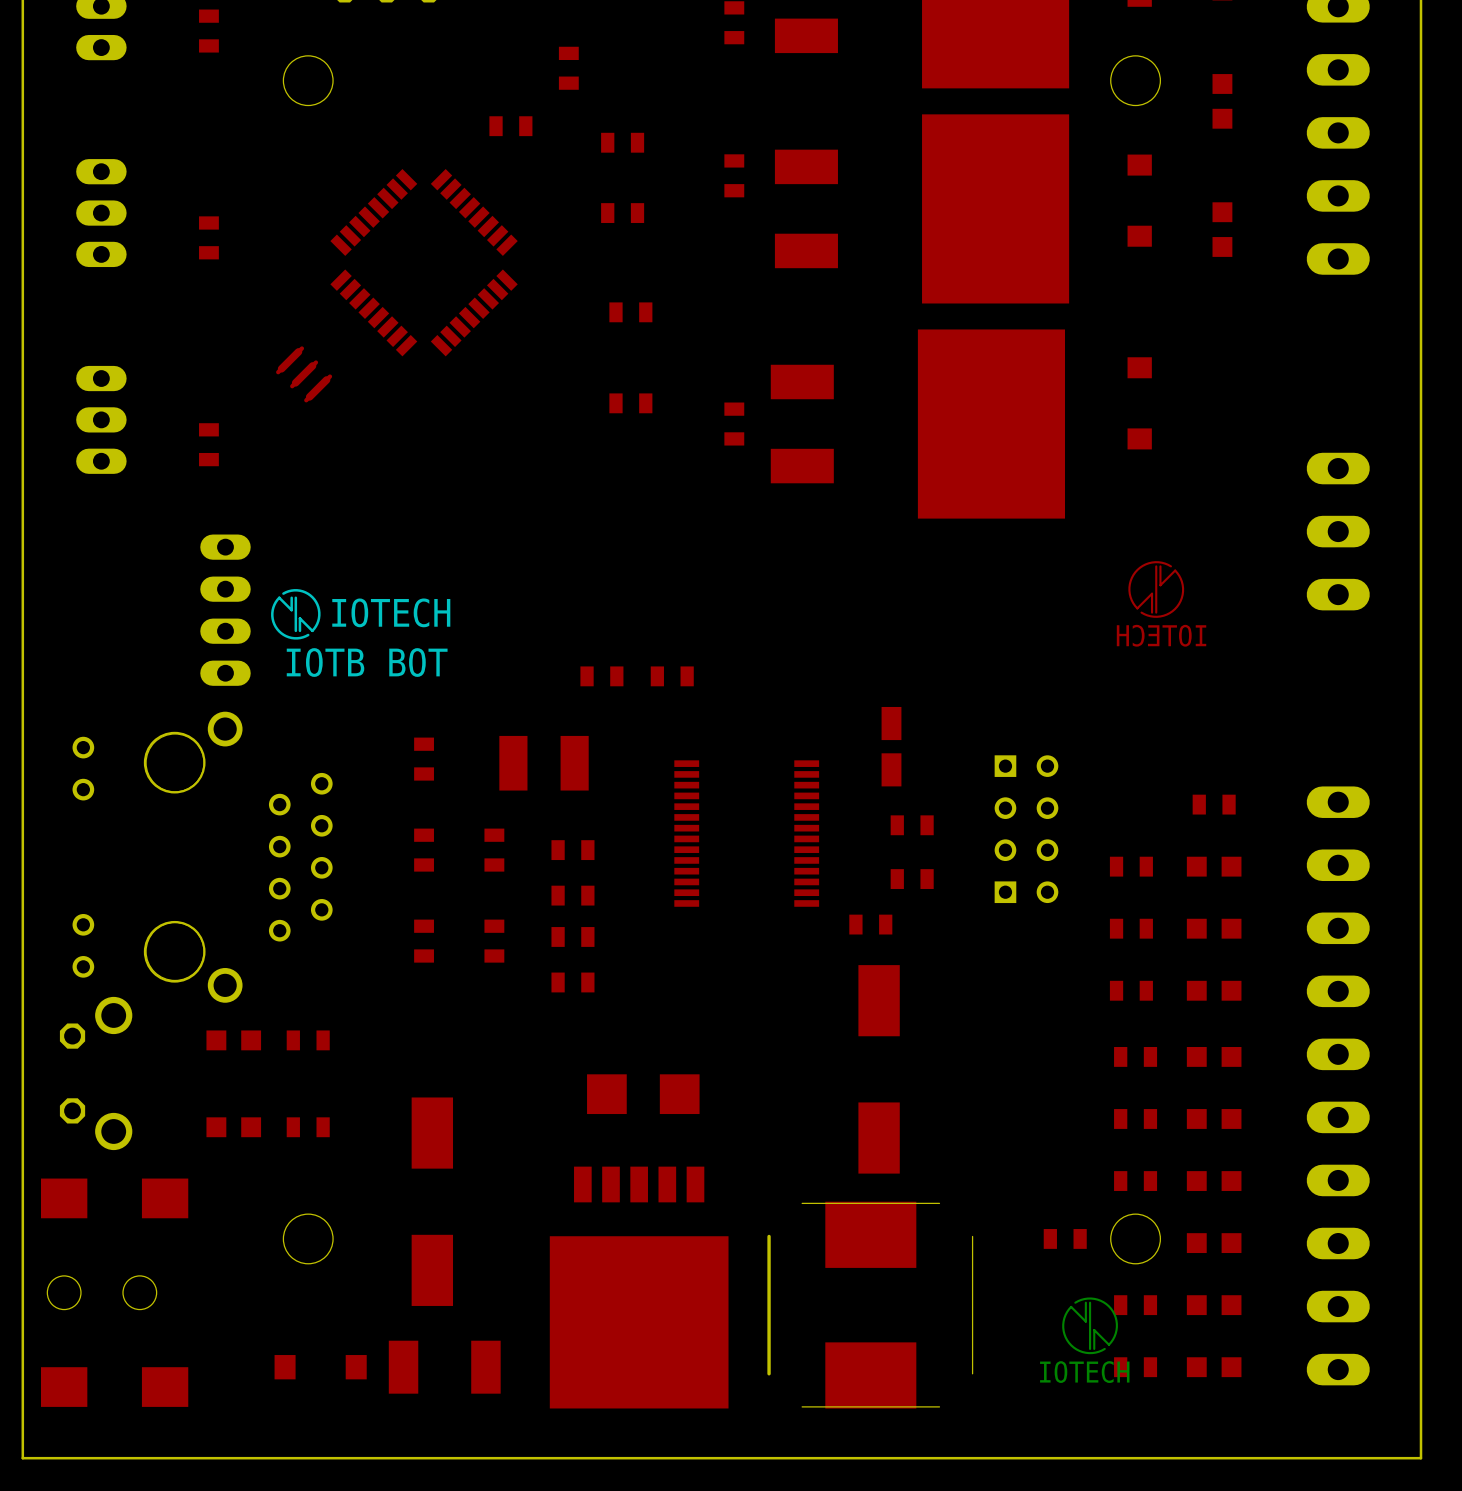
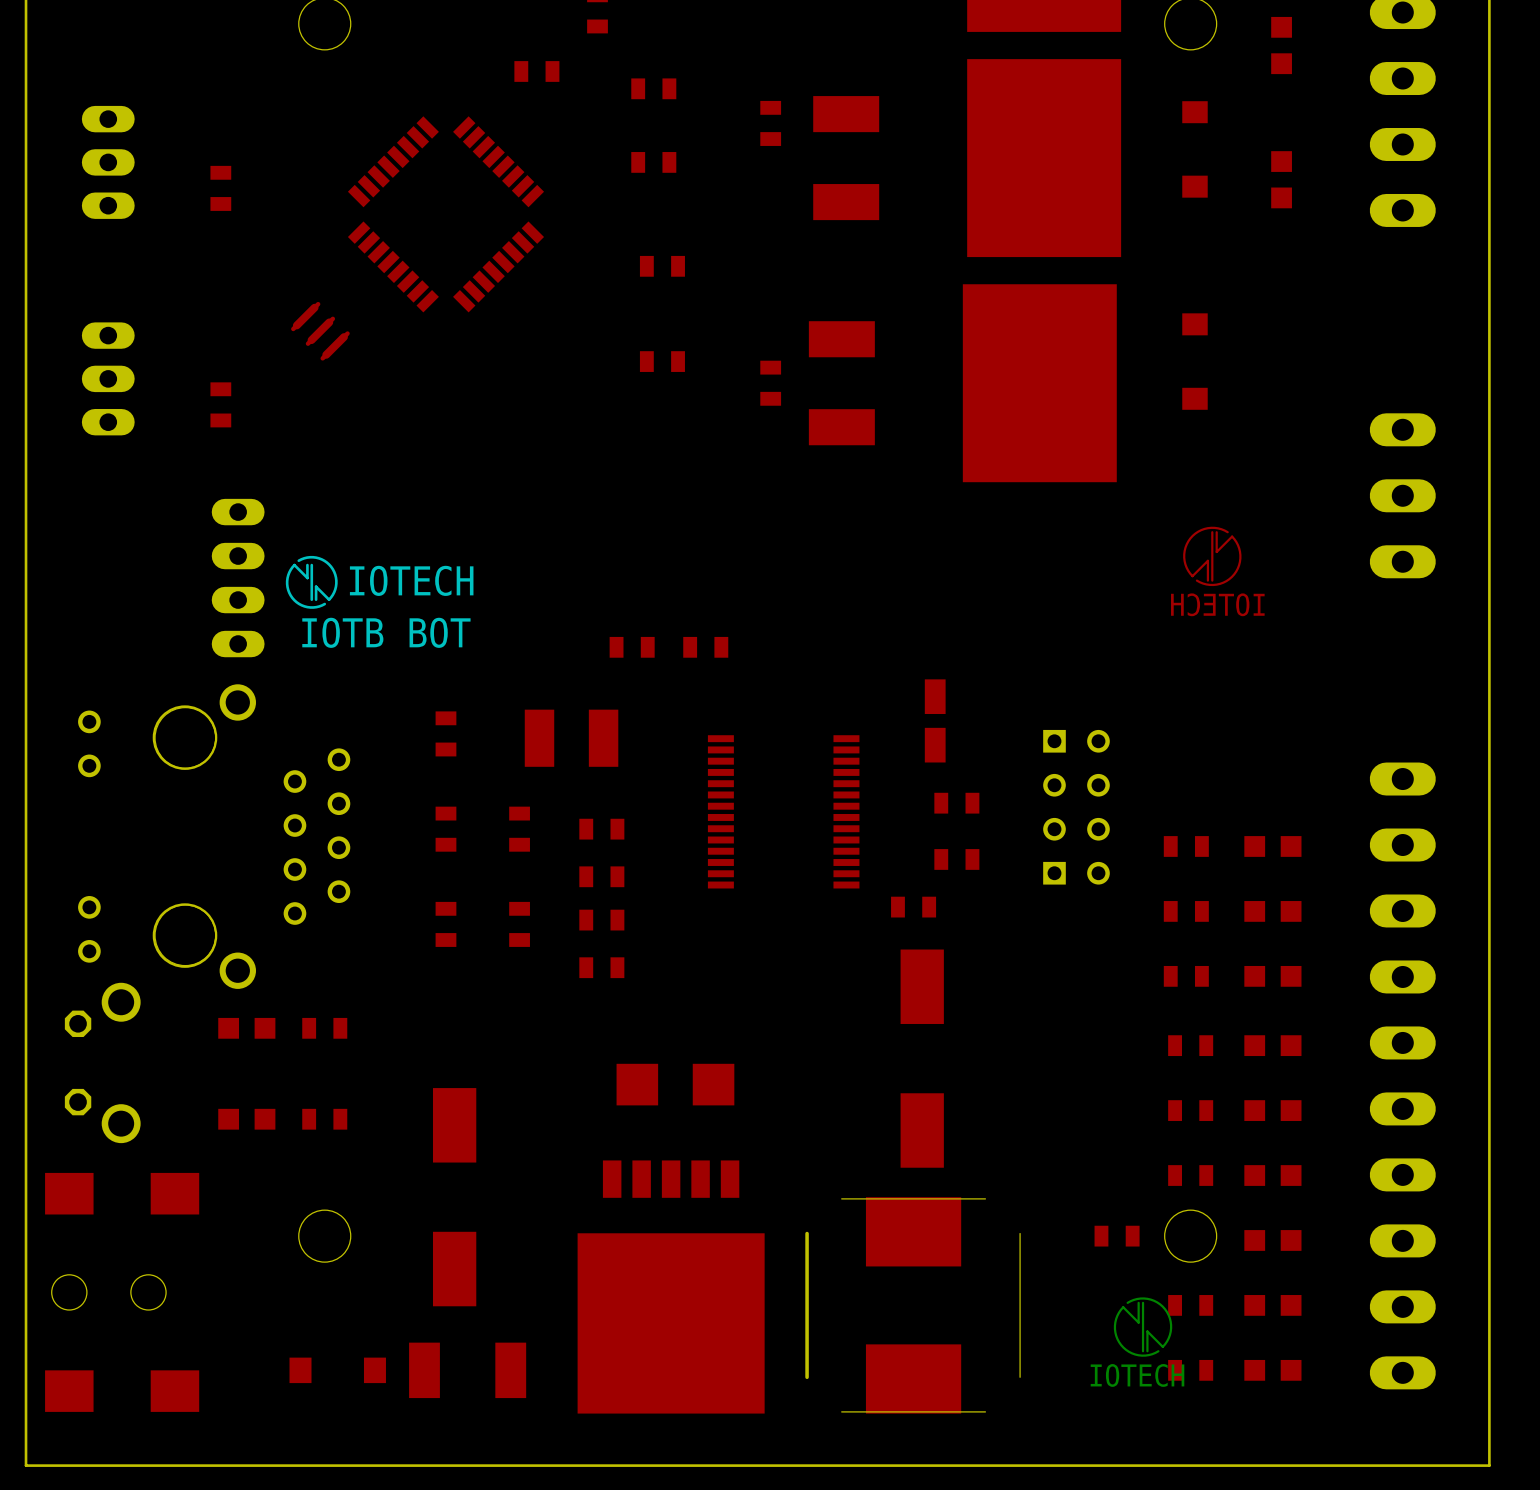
part: (1214, 804) -> none

